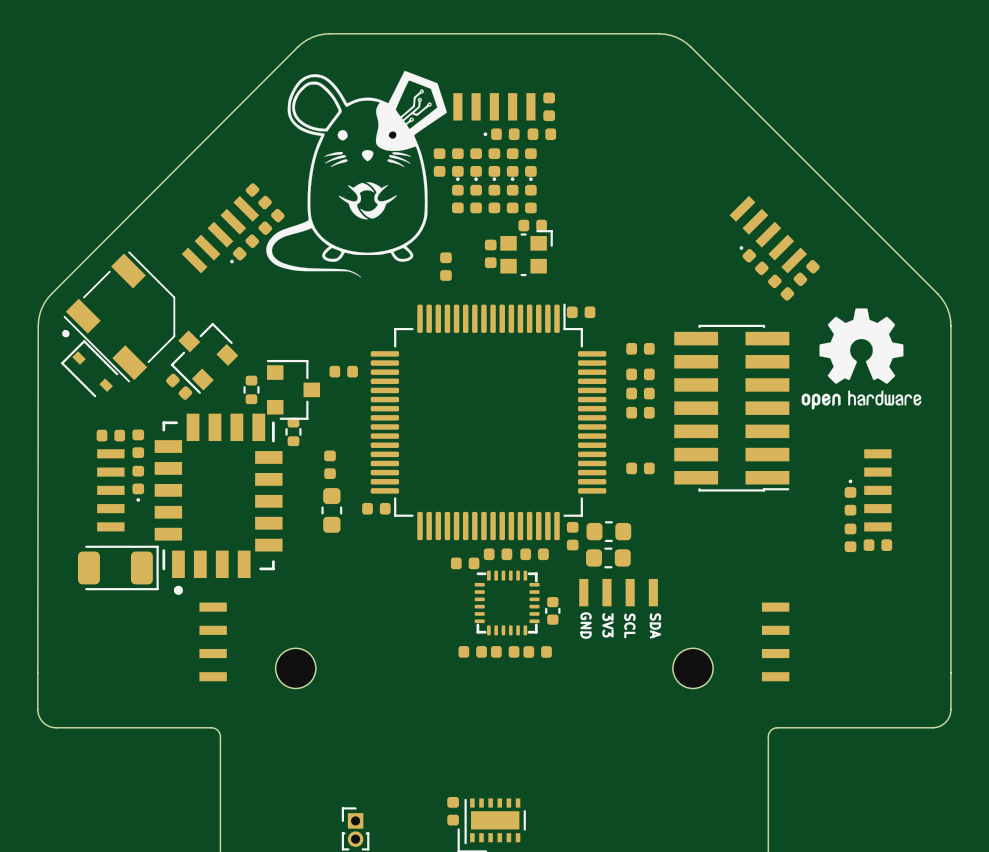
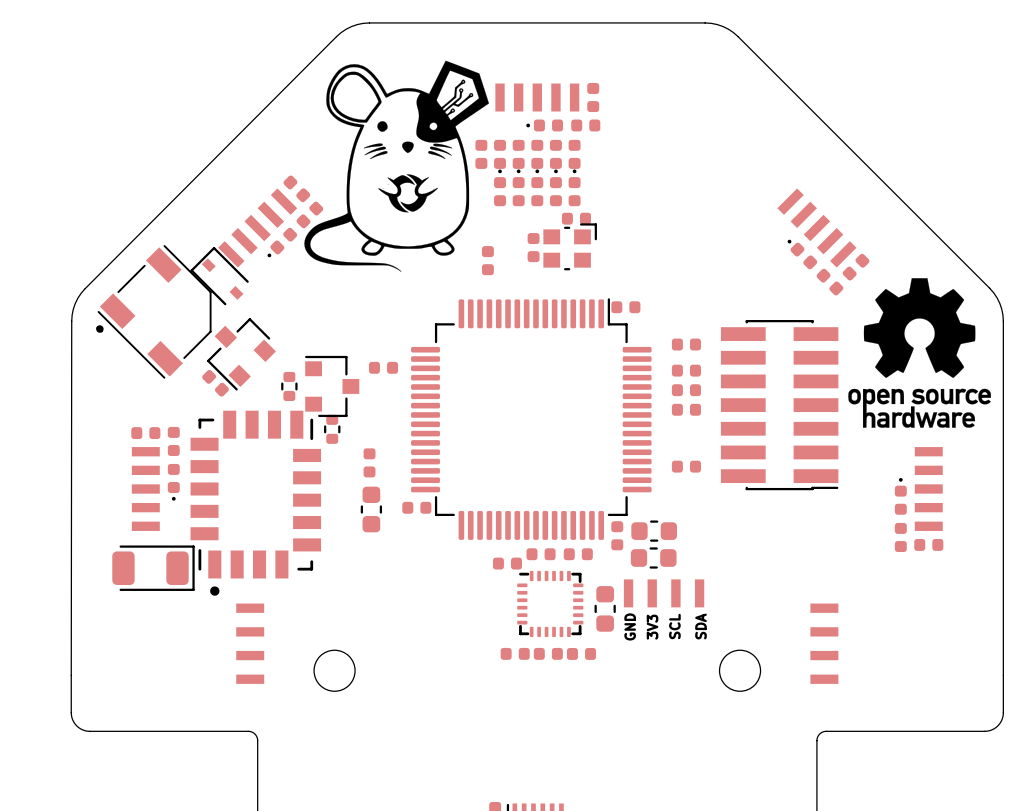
drawing shape: [801, 308, 922, 410] -> [848, 278, 991, 428]
part position: (89, 368) -> (219, 276)
part footprint: [545, 597, 561, 625] -> [594, 586, 616, 632]
text rotation: 0° (586, 625) -> 180° (630, 626)
text rotation: 0° (607, 625) -> 180° (652, 627)
text rotation: 0° (629, 625) -> 180° (674, 626)
text rotation: 0° (655, 625) -> 180° (701, 626)

